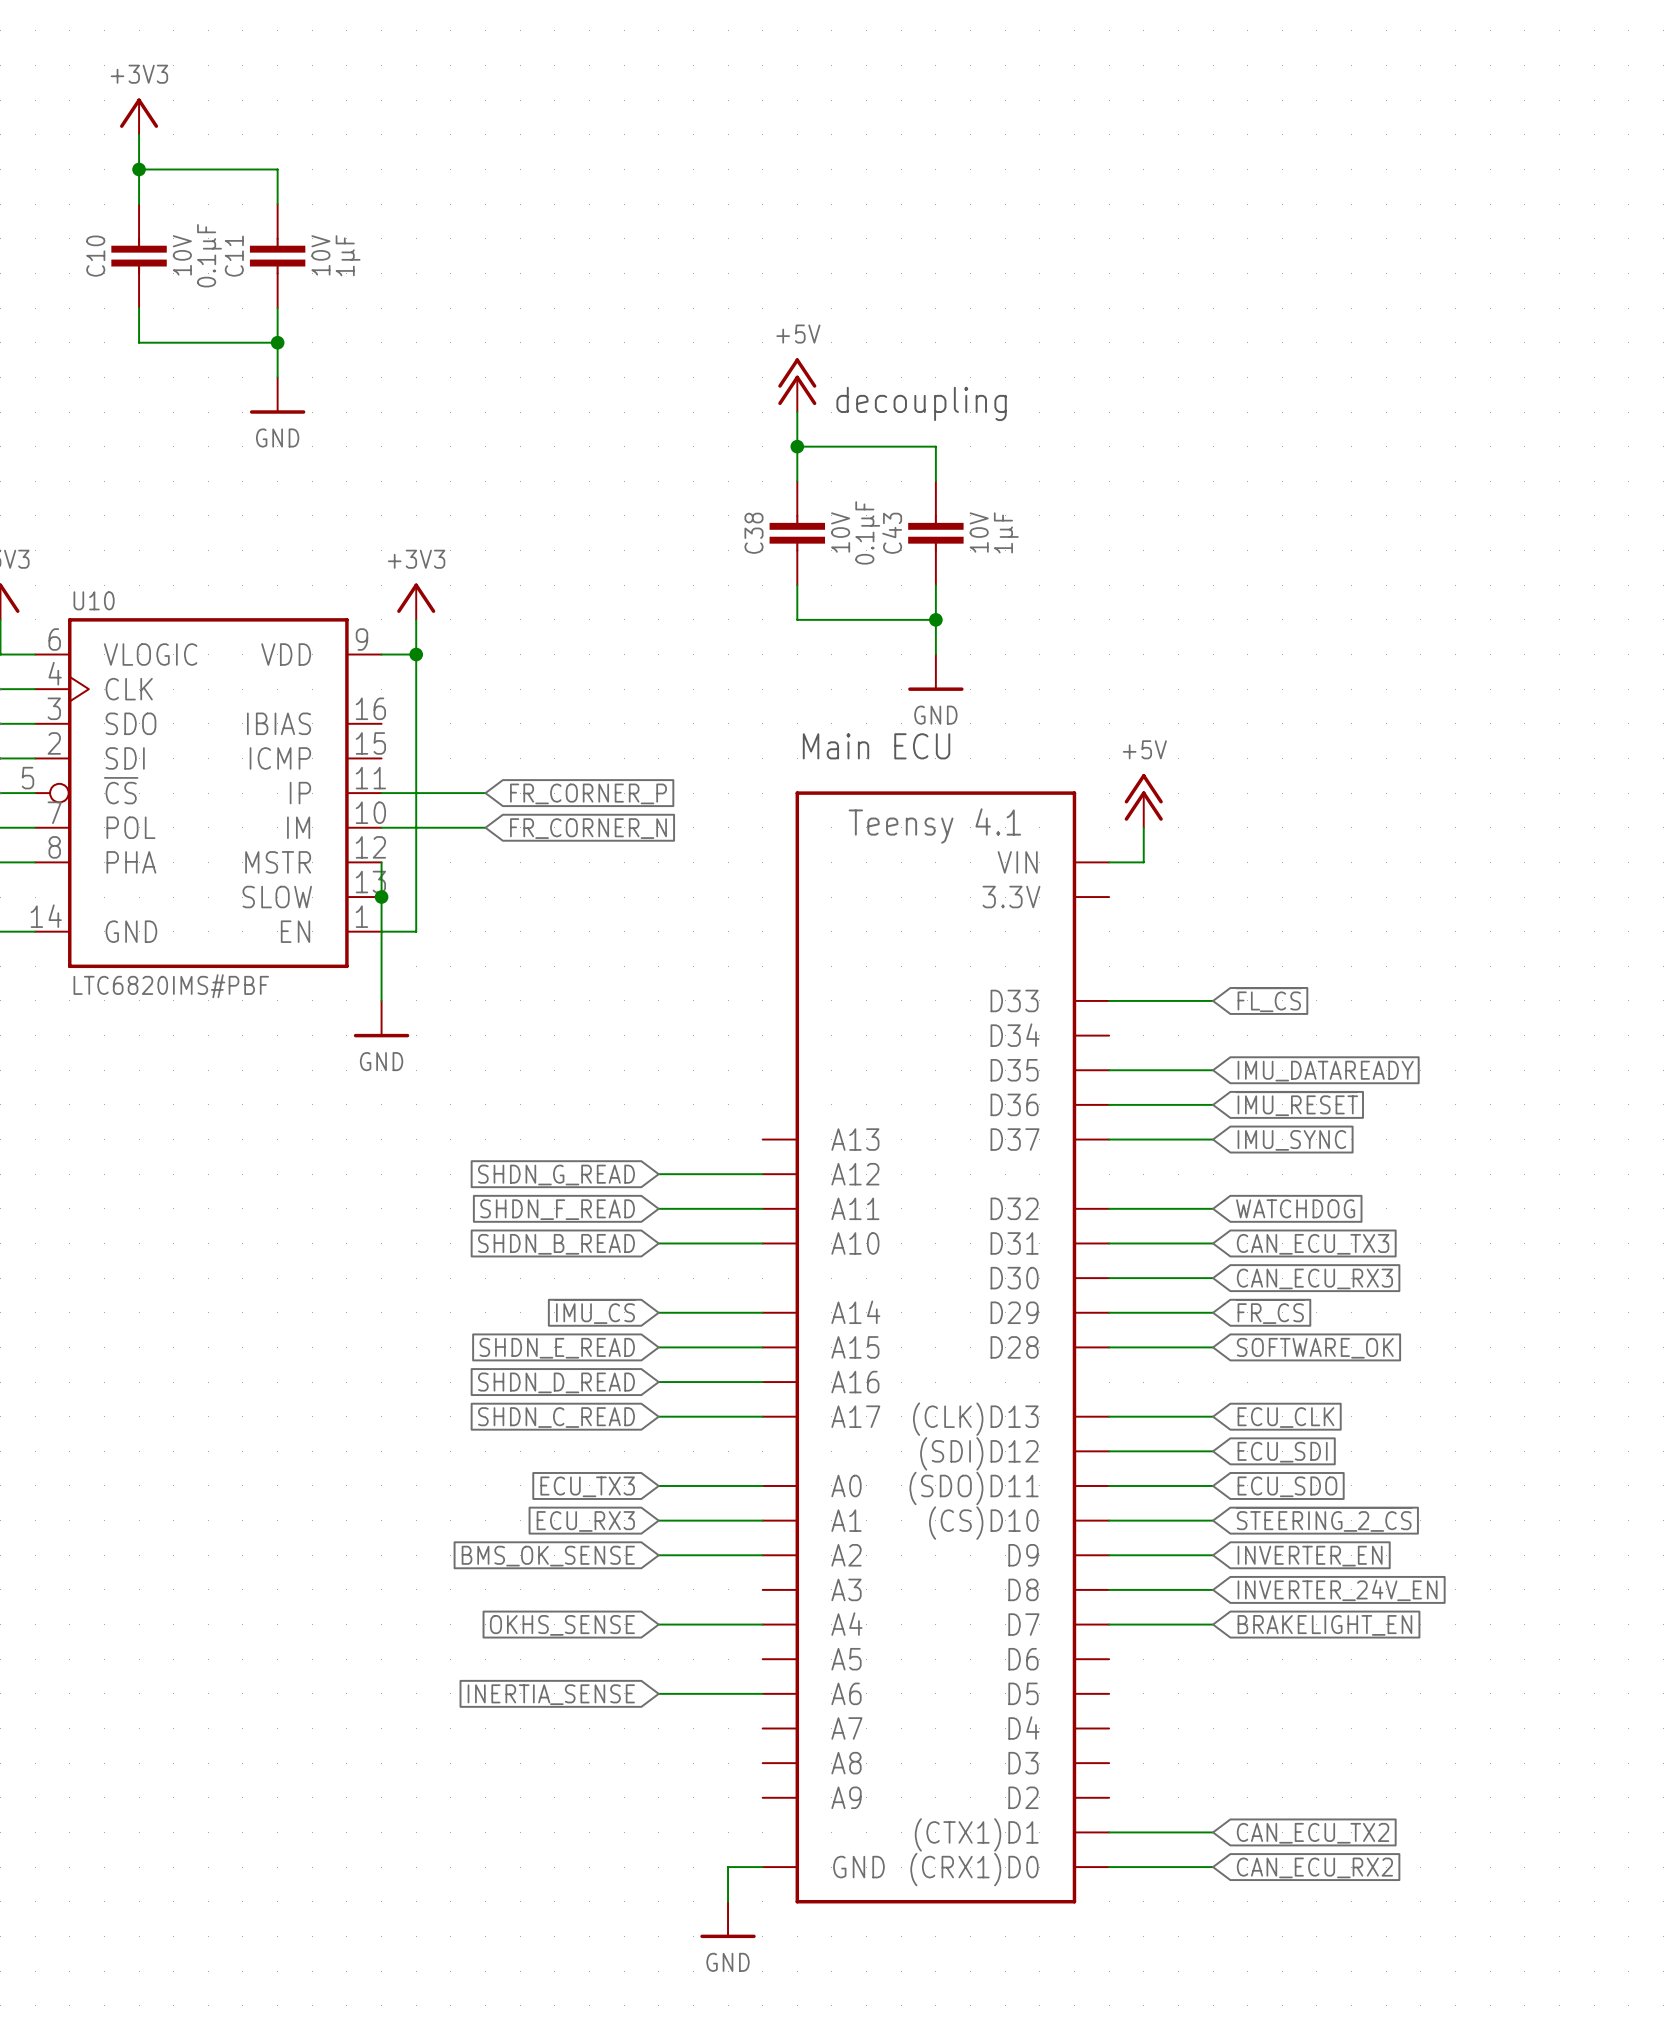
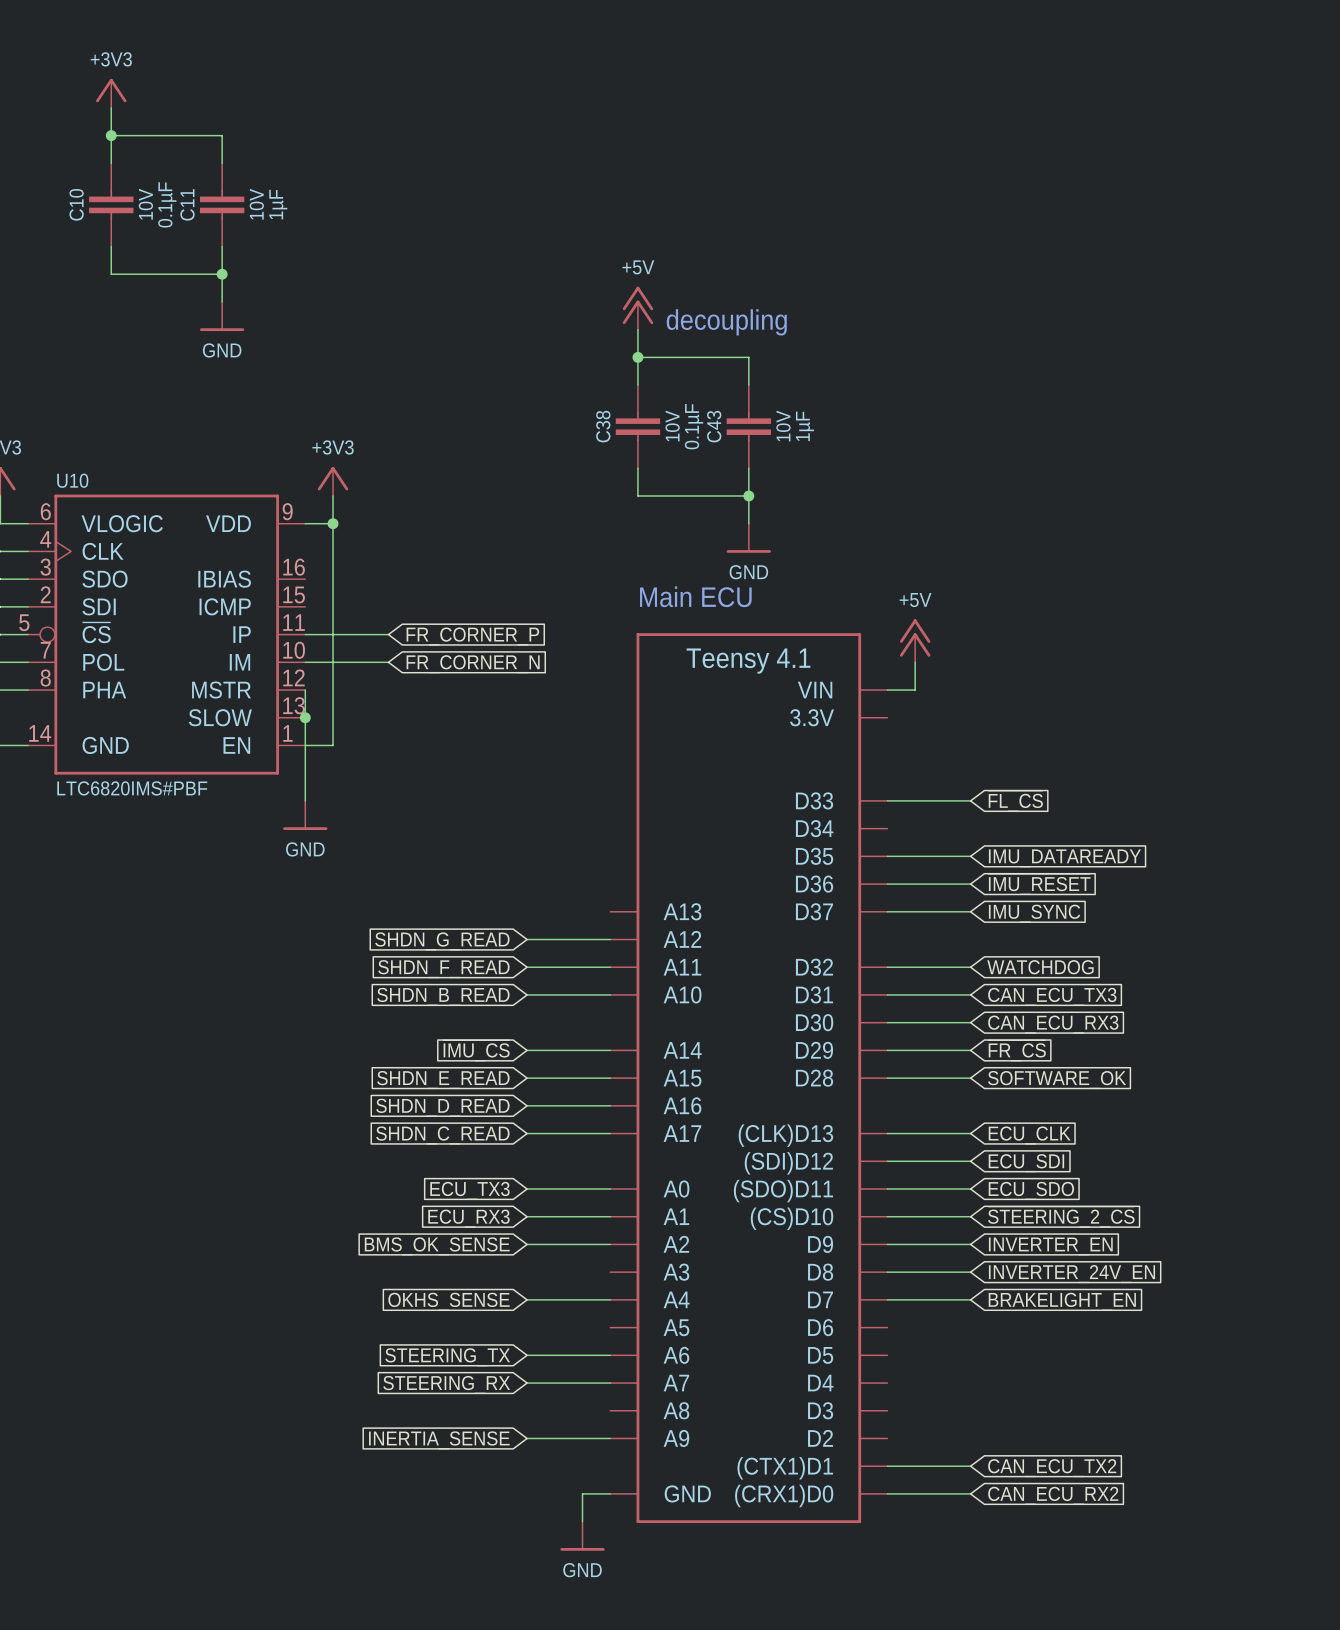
global label: INERTIA_SENSE (551, 1694) -> STEERING_TX (447, 1357)
wire: none -> (527, 1383) (610, 1383)
global label: none -> STEERING_RX (446, 1384)
wire: none -> (527, 1438) (610, 1438)
global label: none -> INERTIA_SENSE (439, 1440)

